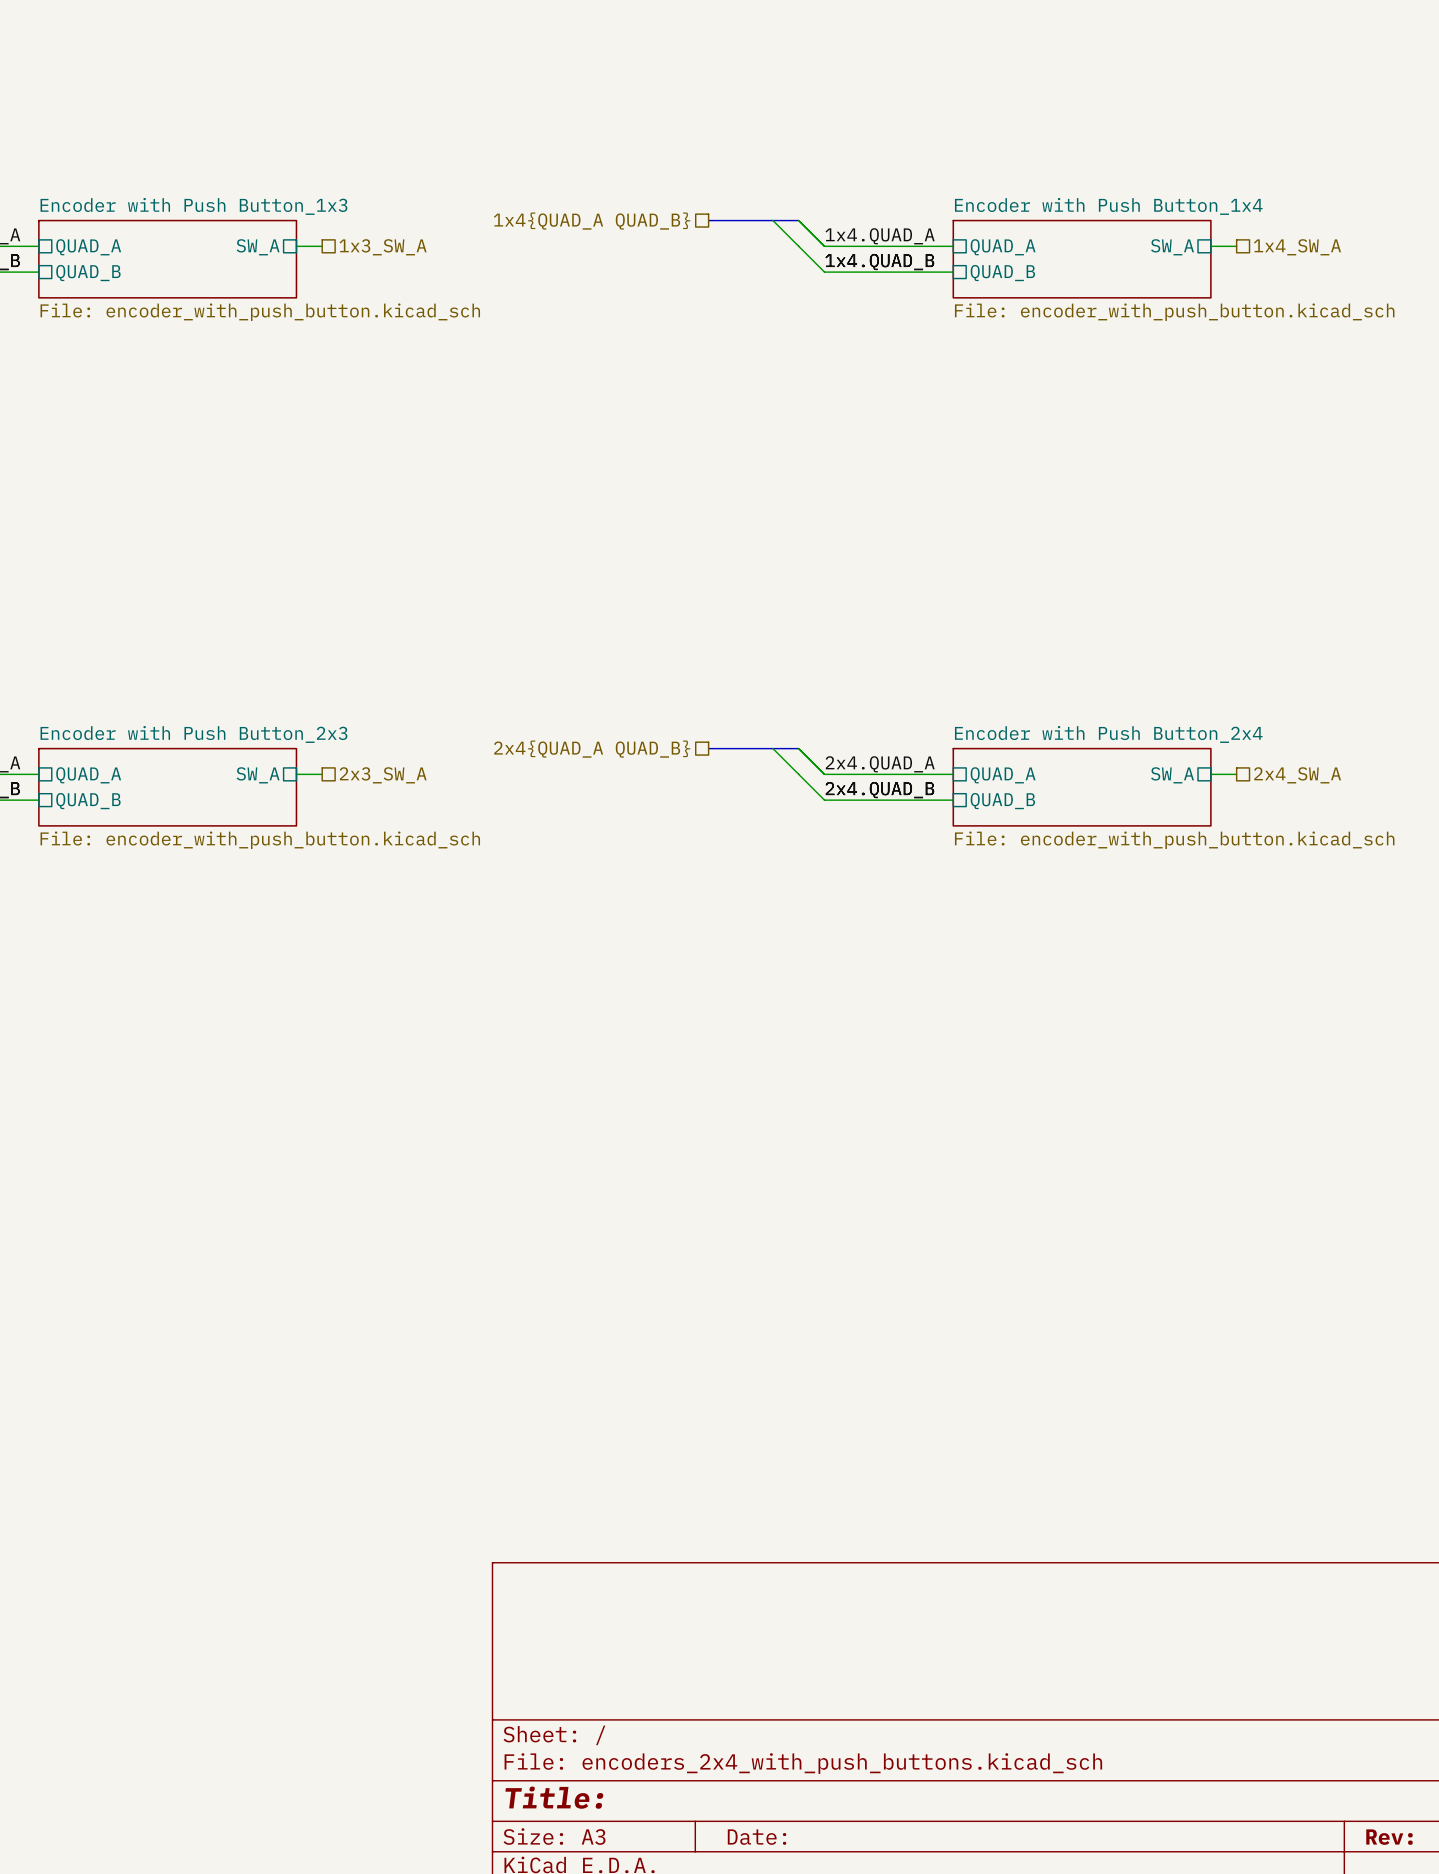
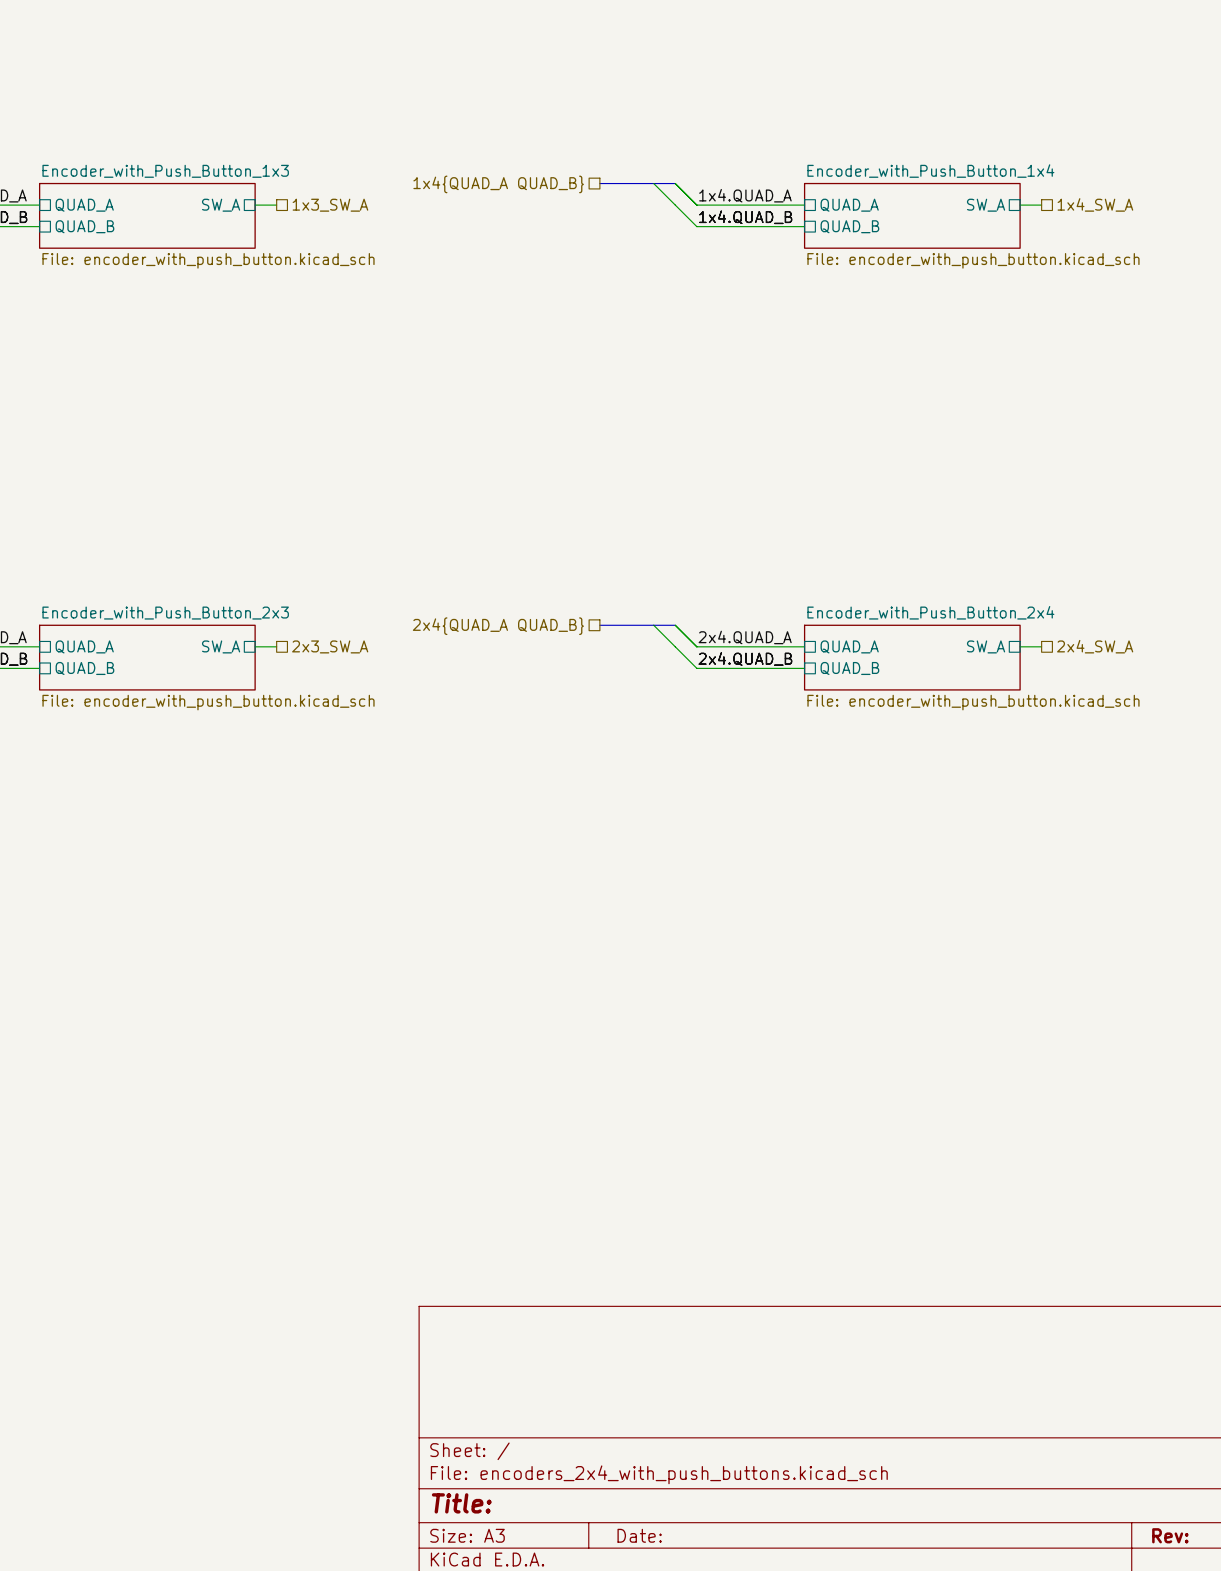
sheet Encoder with Push Button_1x3 name: Encoder with Push Button_1x3 (193, 206) -> Encoder_with_Push_Button_1x3 (165, 171)
sheet Encoder with Push Button_1x4 name: Encoder with Push Button_1x4 (1108, 206) -> Encoder_with_Push_Button_1x4 (930, 171)
sheet Encoder with Push Button_2x3 name: Encoder with Push Button_2x3 (193, 734) -> Encoder_with_Push_Button_2x3 (165, 613)
sheet Encoder with Push Button_2x4 name: Encoder with Push Button_2x4 (1108, 734) -> Encoder_with_Push_Button_2x4 (930, 612)

